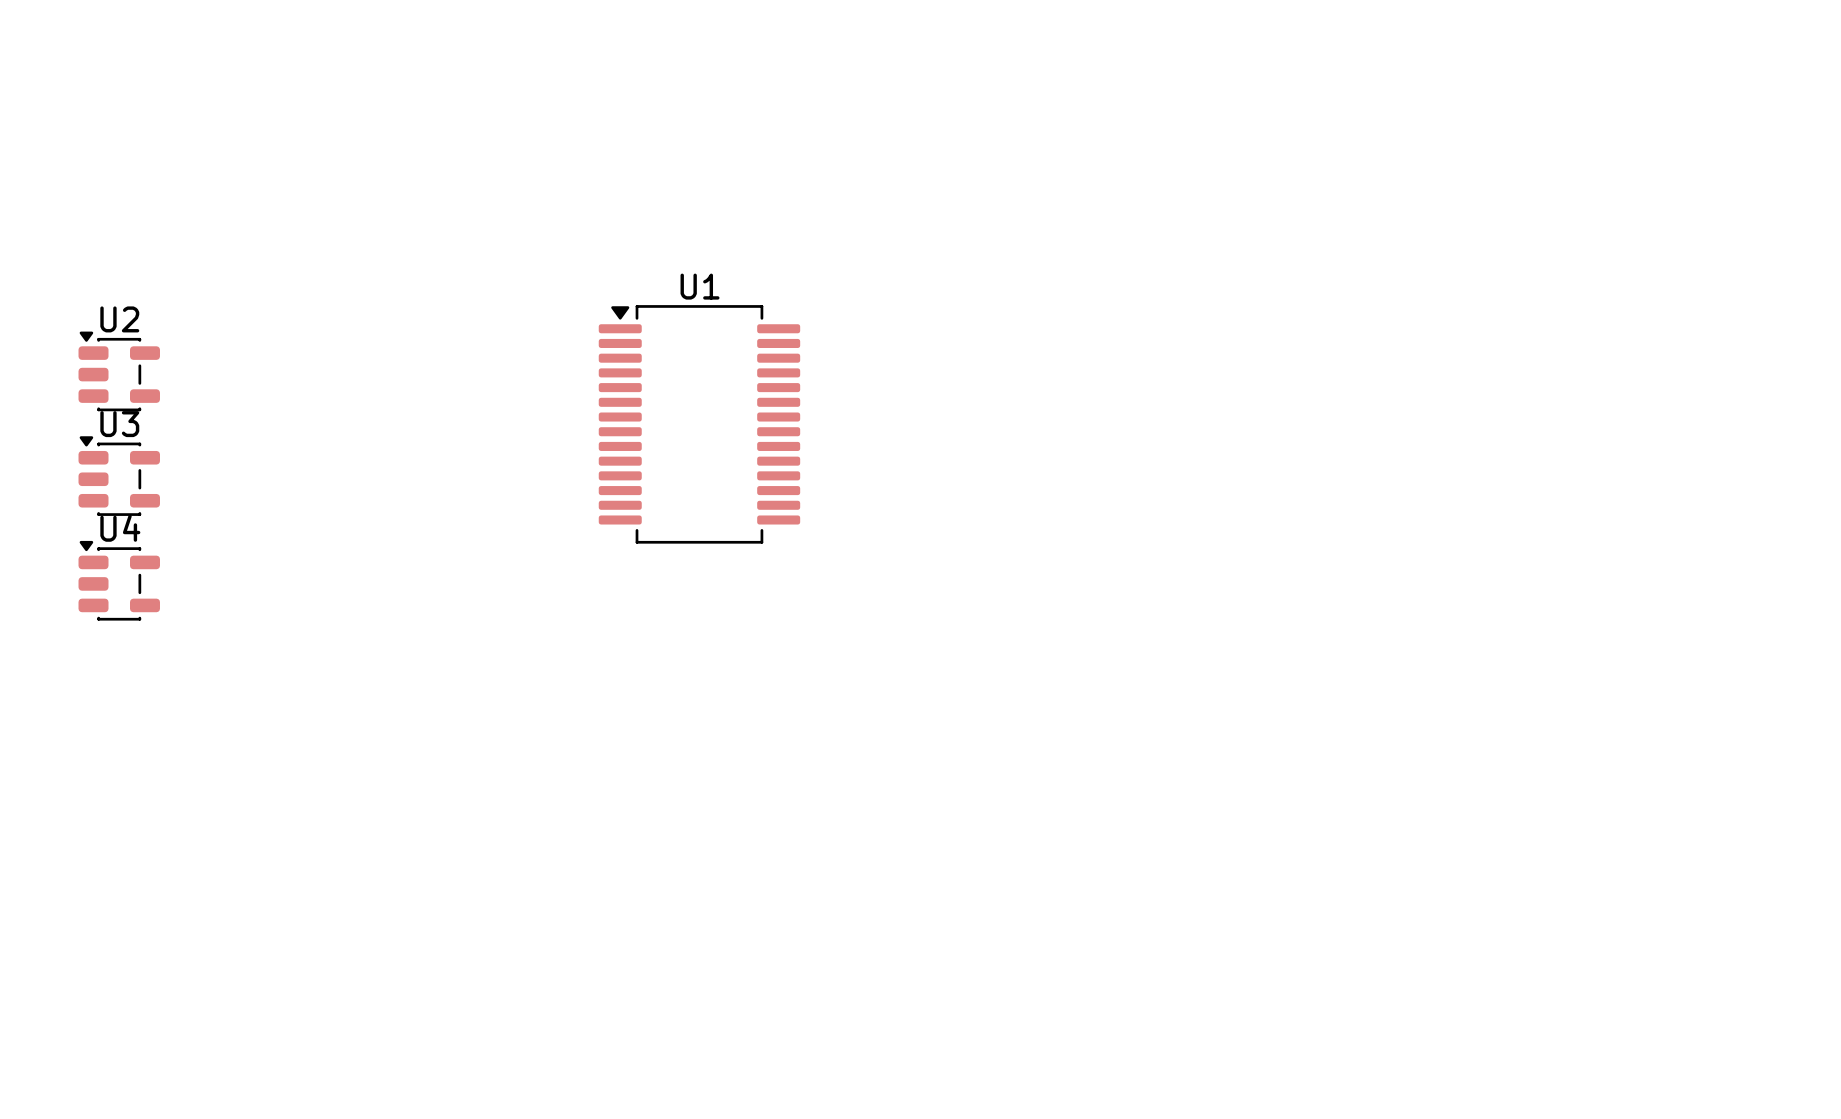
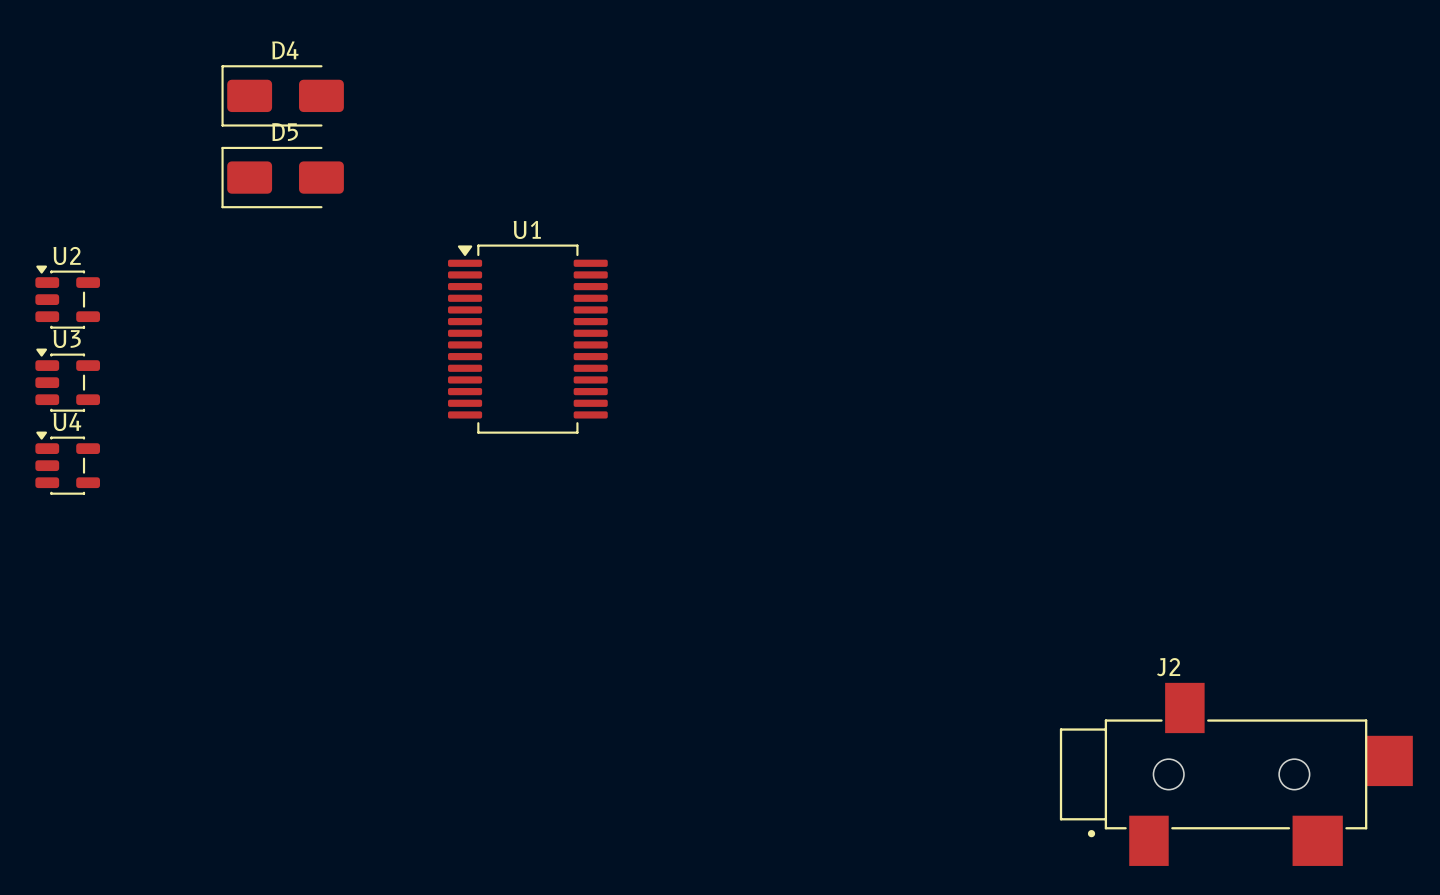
D4: none -> (282, 95)
D5: none -> (282, 177)
J2: none -> (1236, 774)

